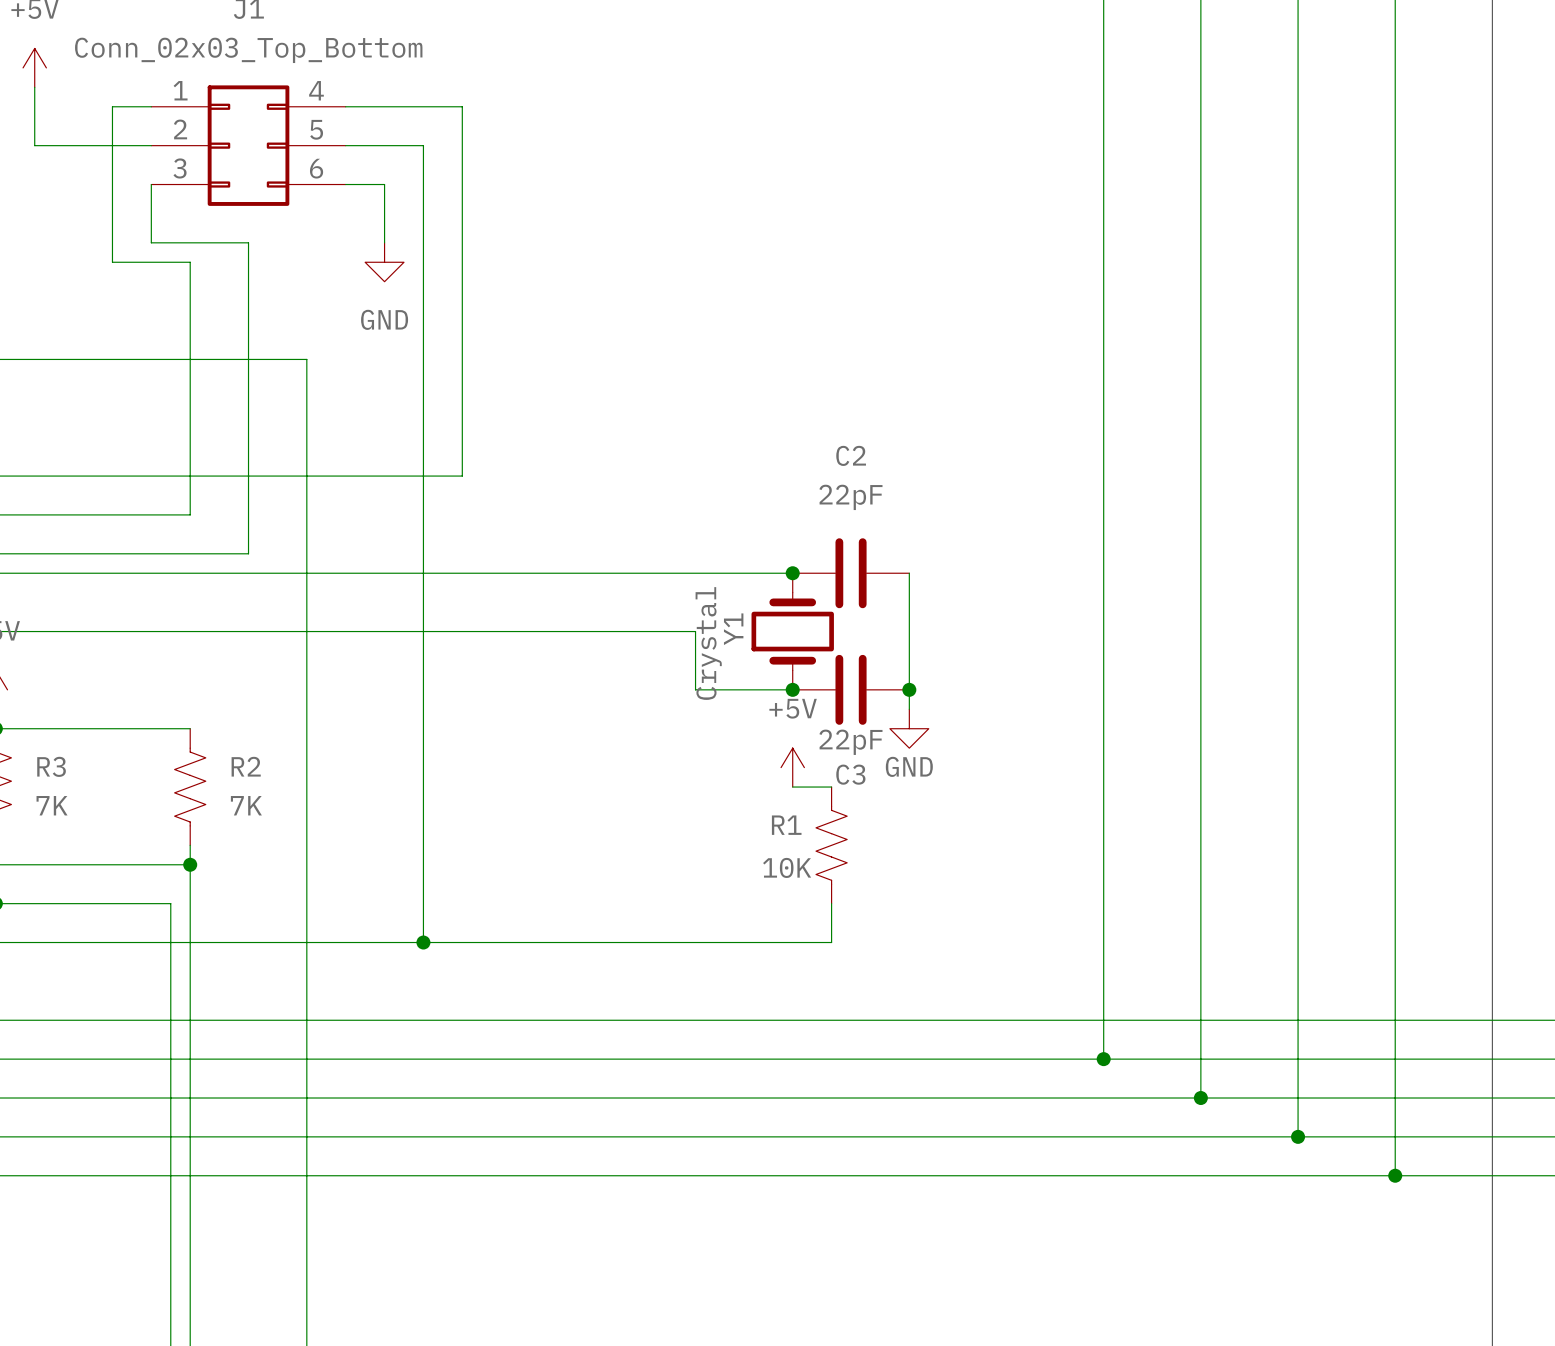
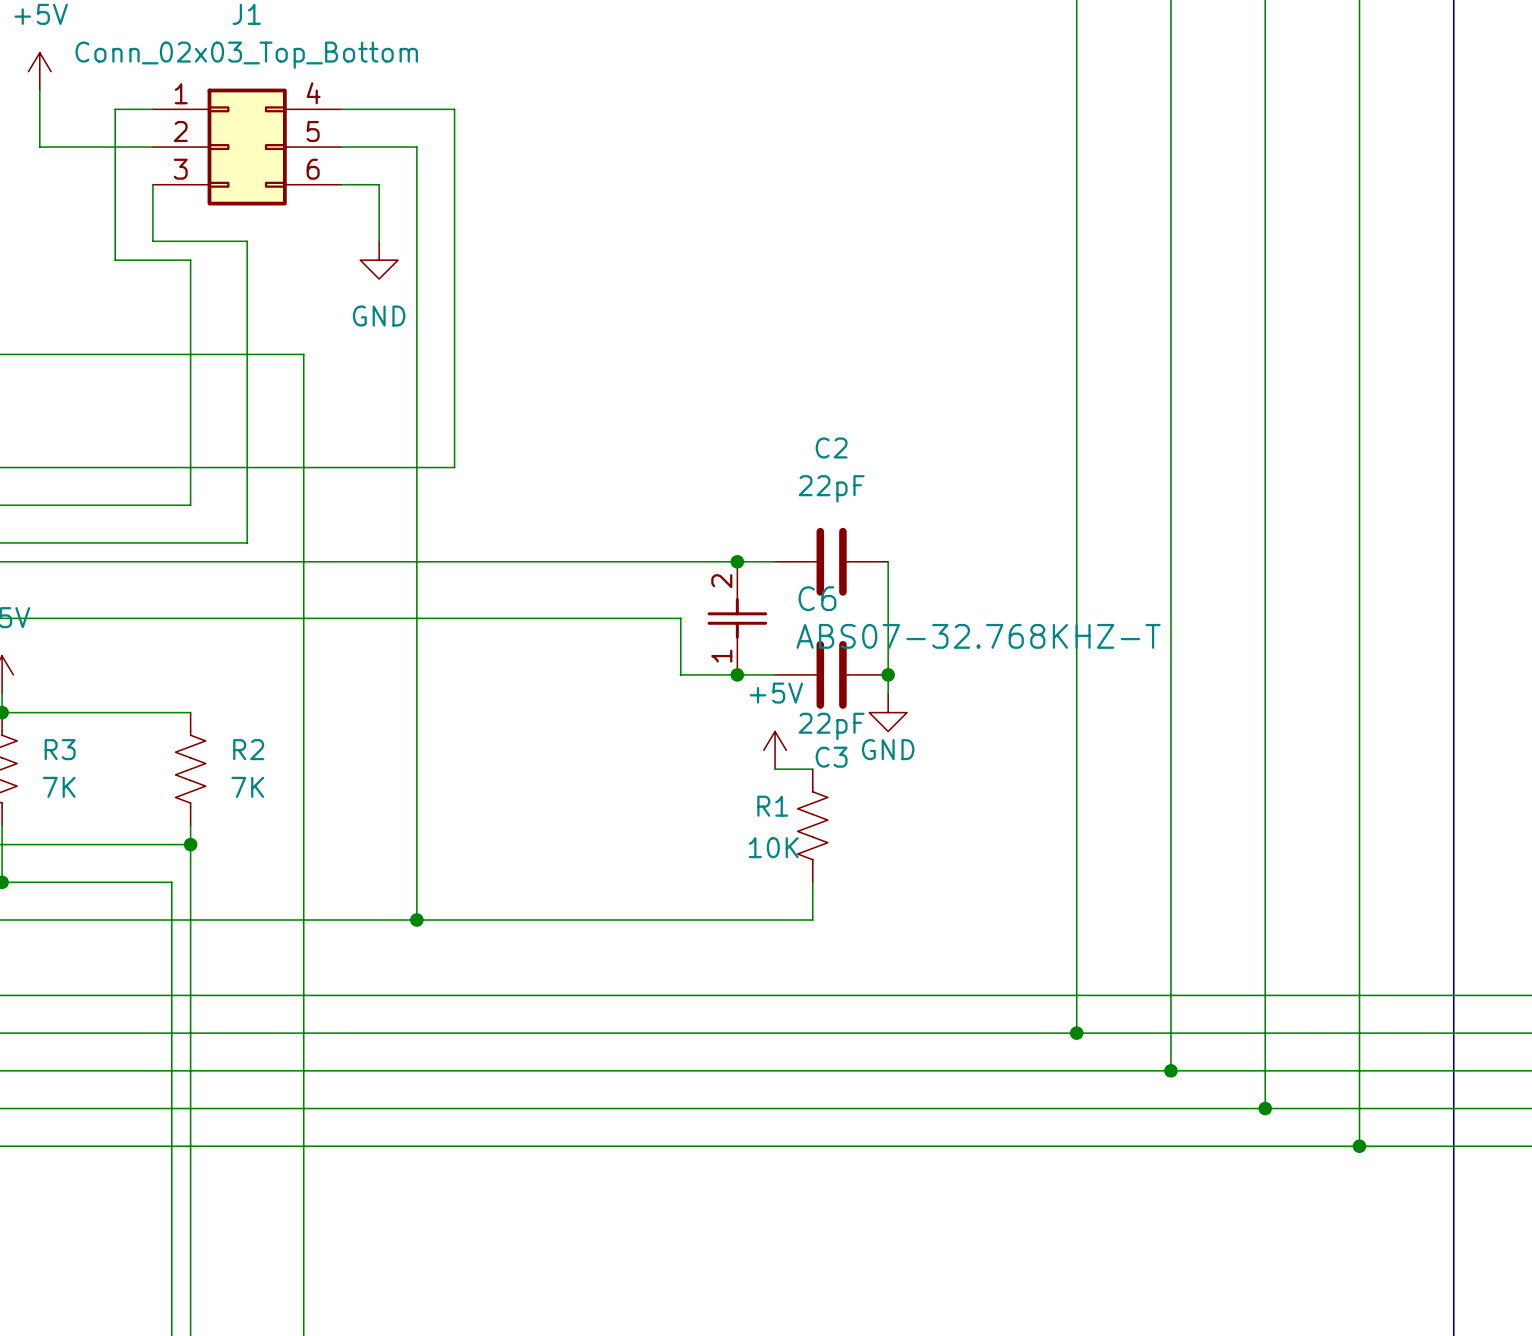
junction position: (792, 573) -> (737, 561)
C6: none -> ABS07-32.768KHZ-T (737, 618)
Y1: Crystal (792, 631) -> none
junction position: (792, 689) -> (737, 674)

